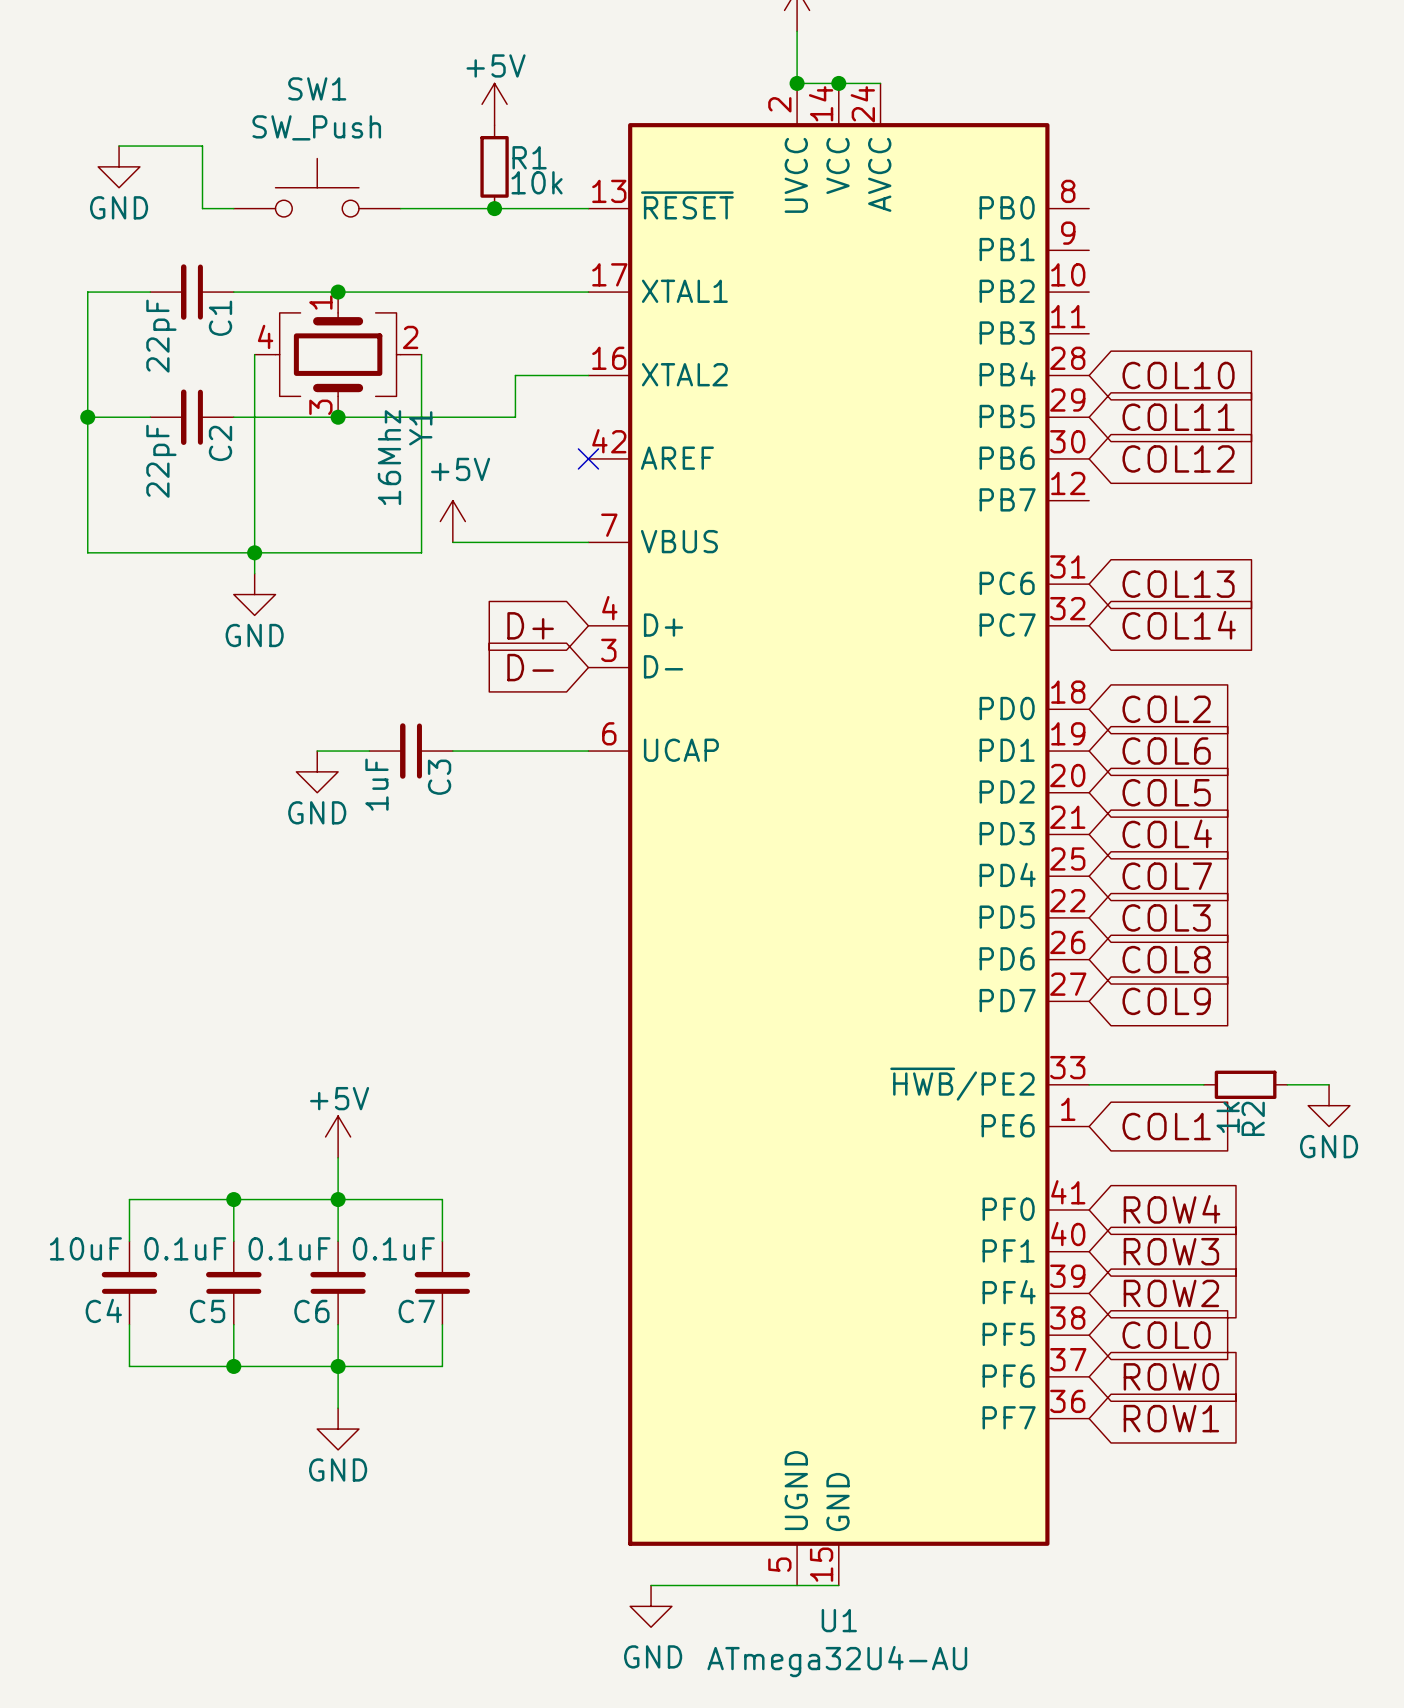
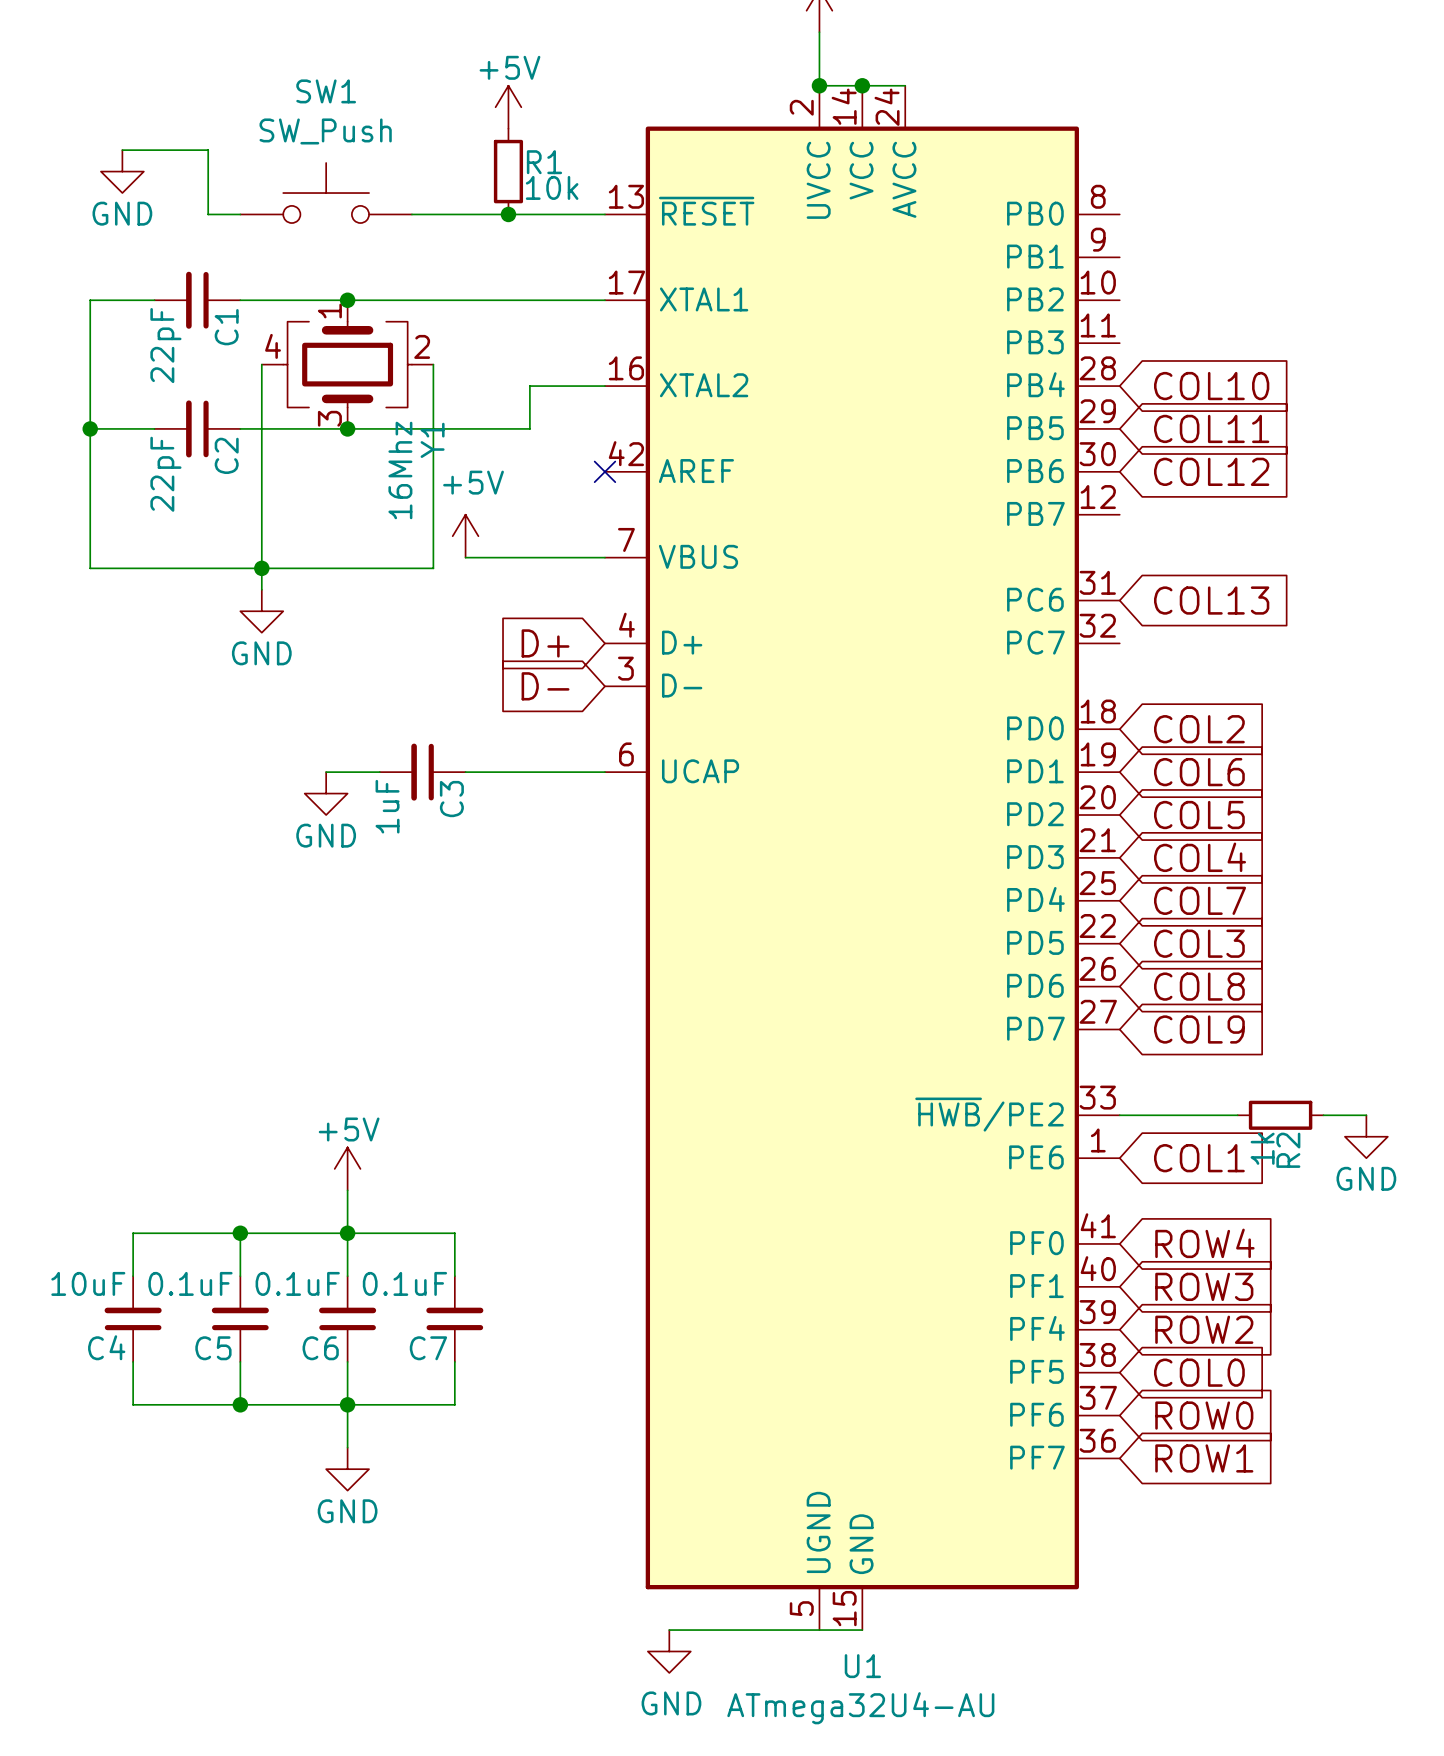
global label: COL14 (1179, 625) -> none

